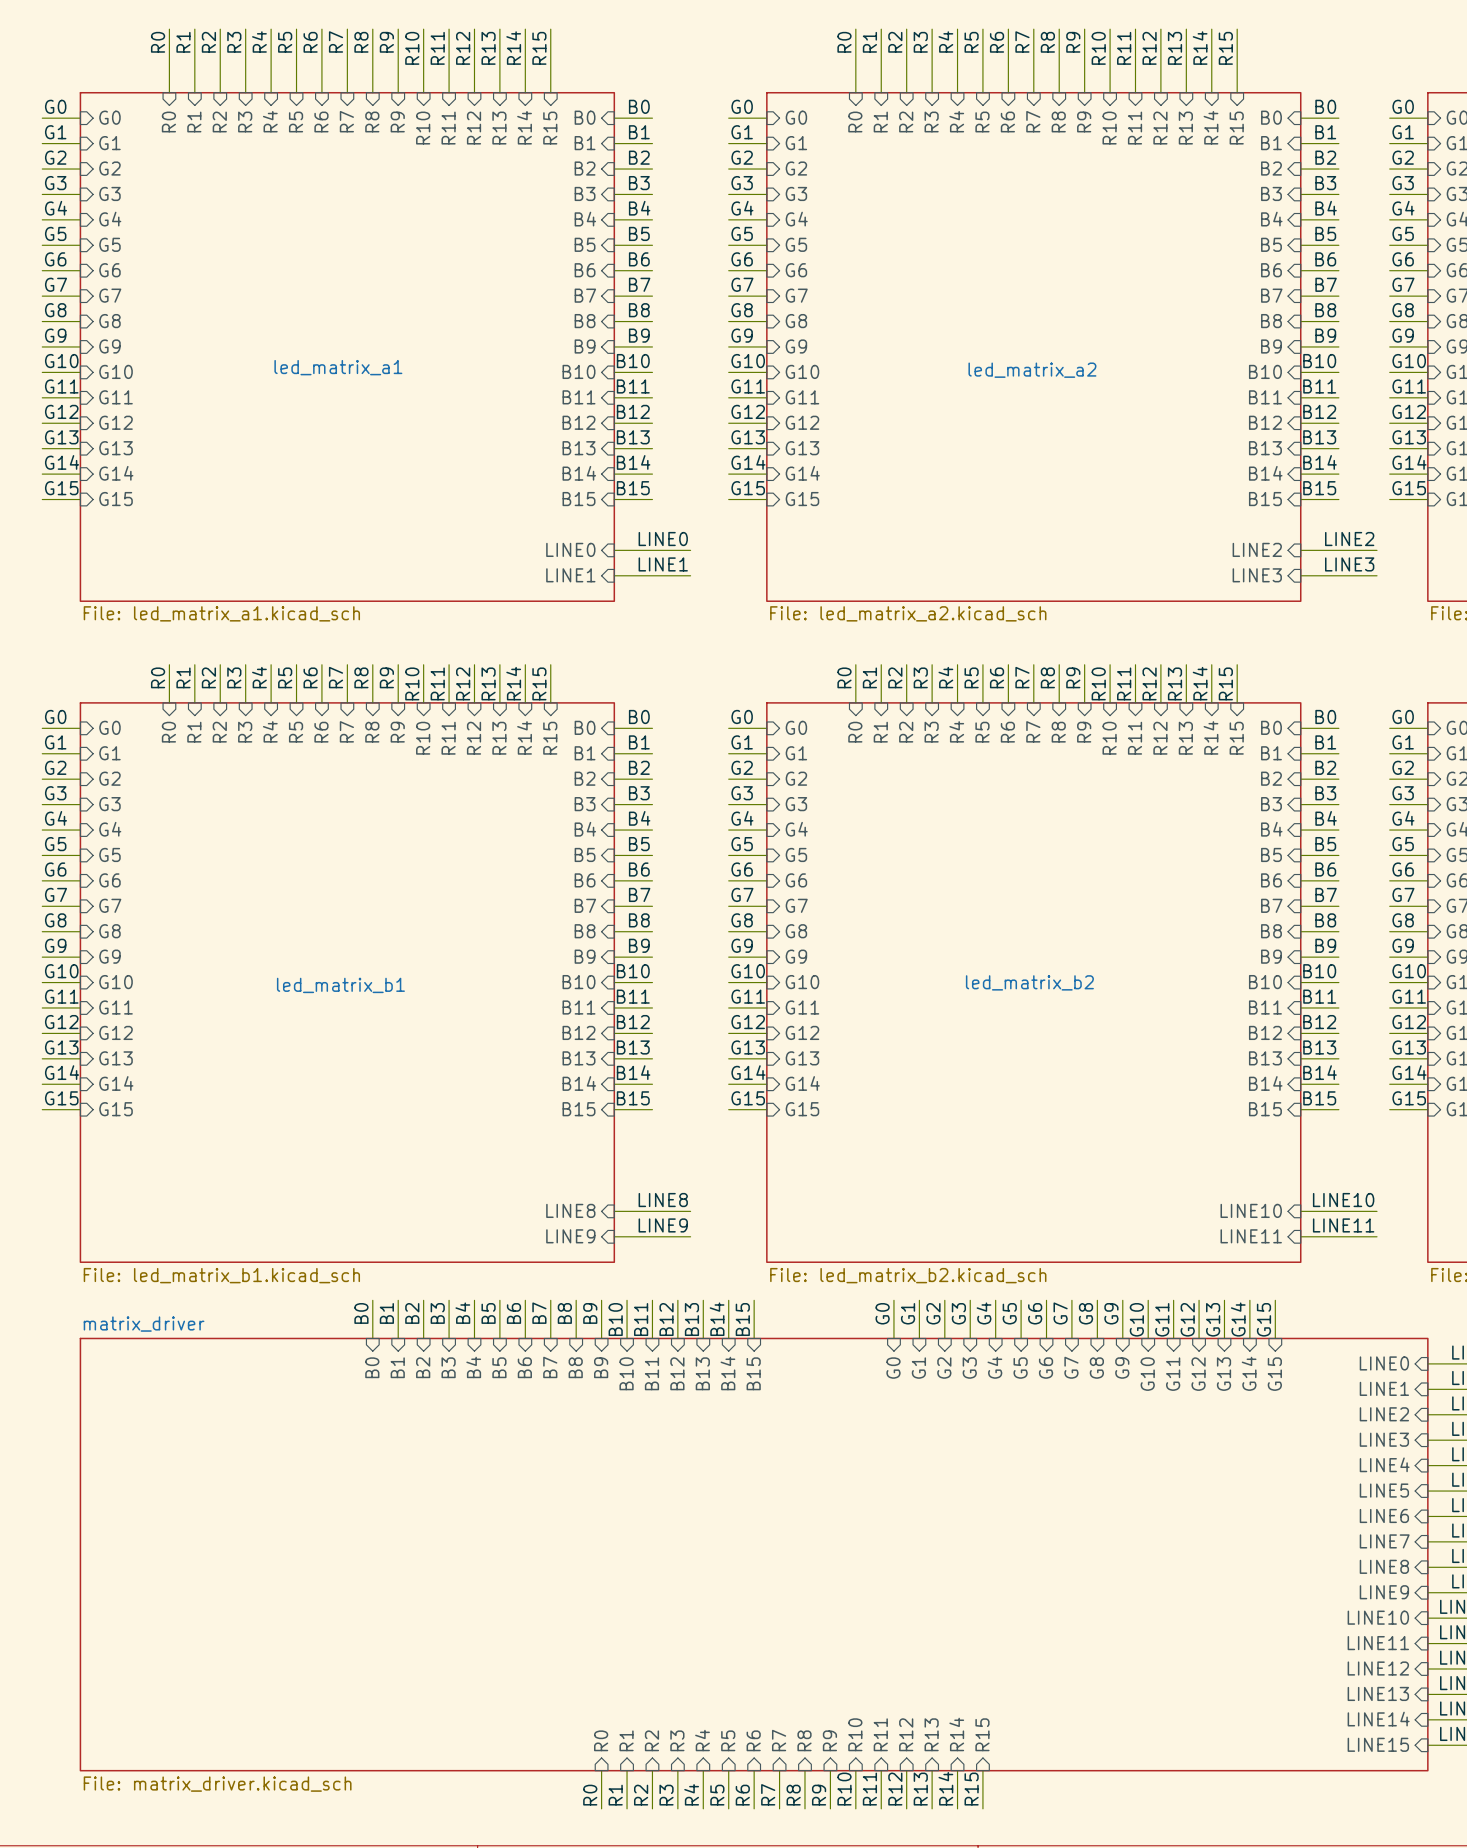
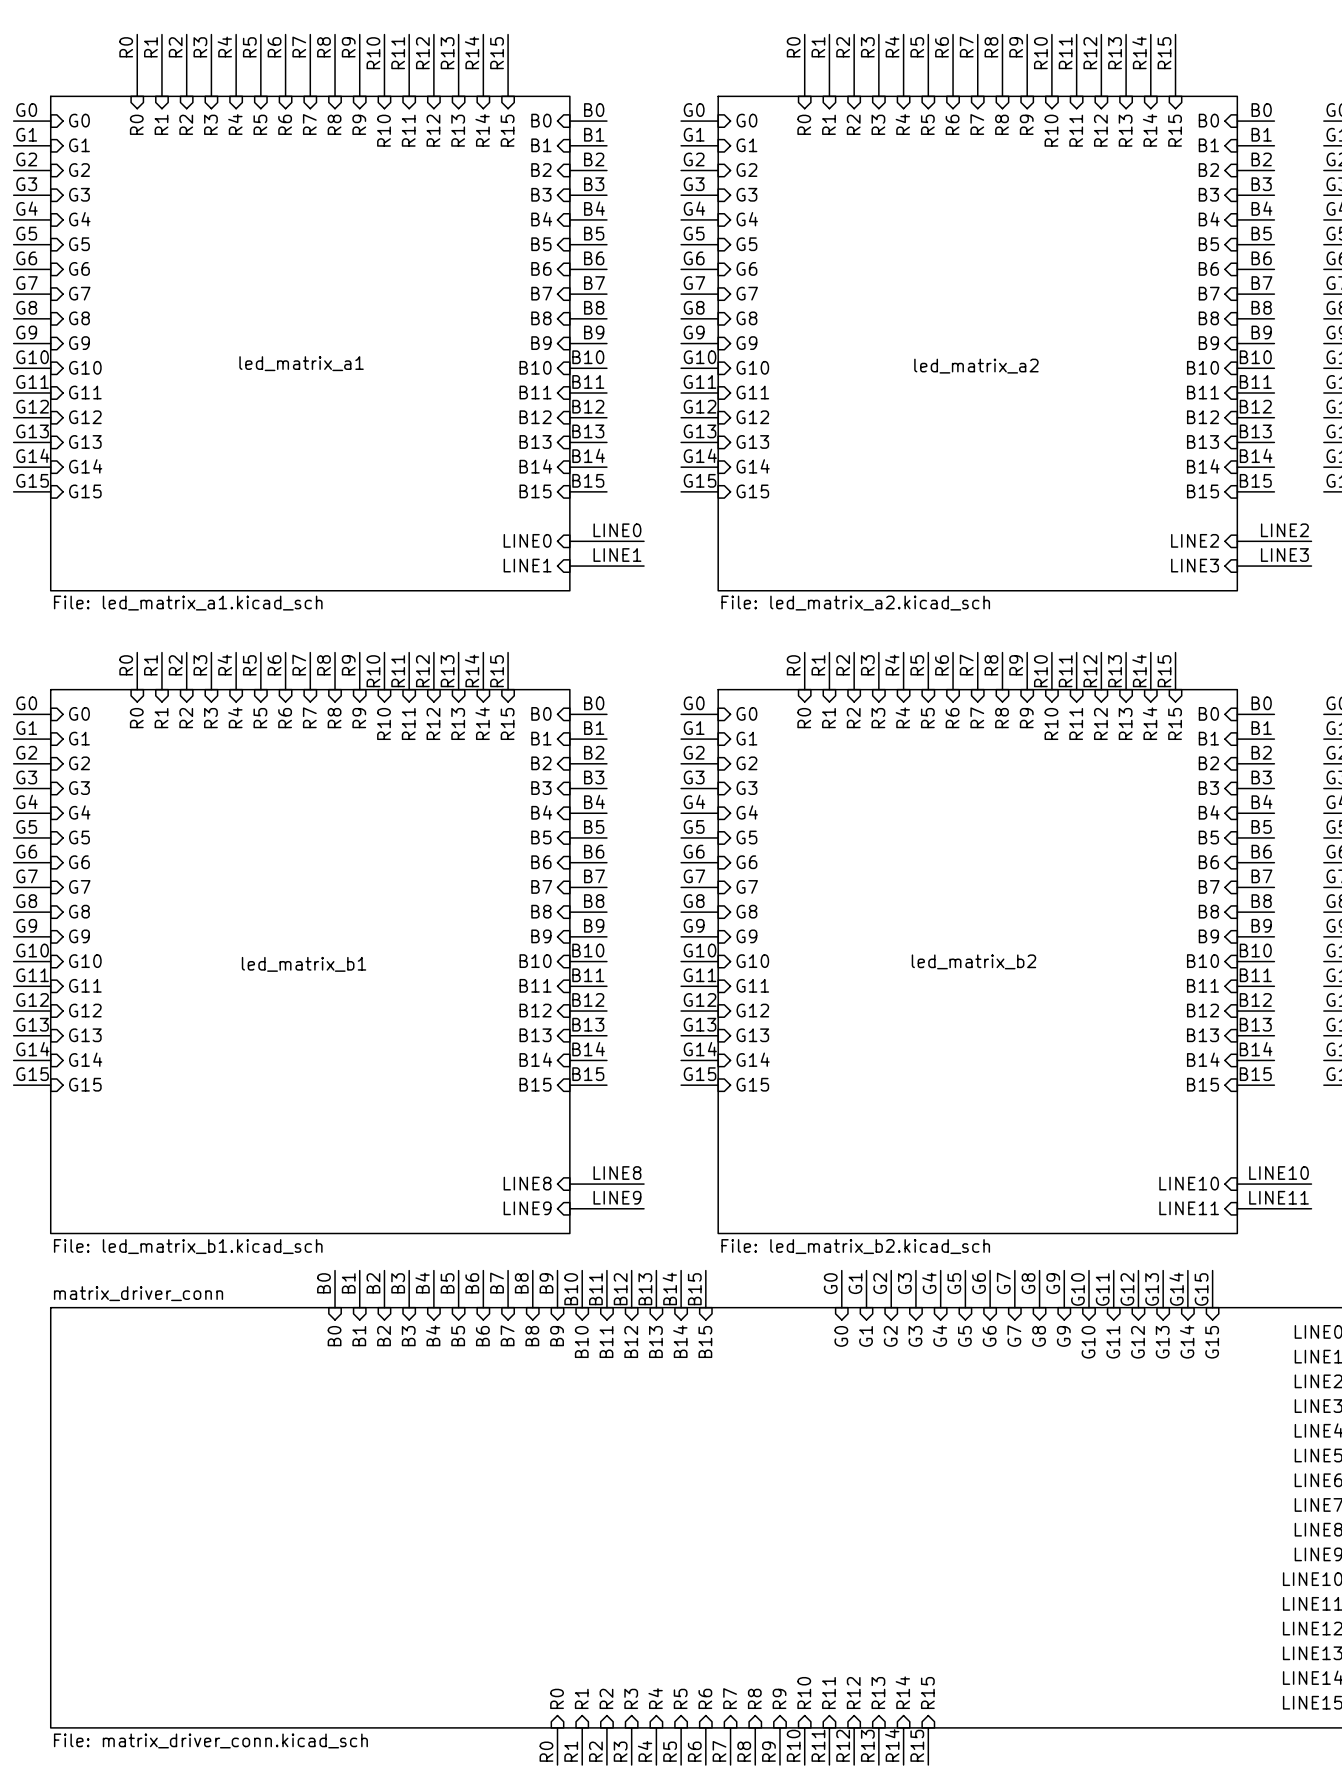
sheet matrix_driver name: matrix_driver (144, 1324) -> matrix_driver_conn (138, 1293)
sheet matrix_driver value: File: matrix_driver.kicad_sch (217, 1784) -> File: matrix_driver_conn.kicad_sch (210, 1740)

